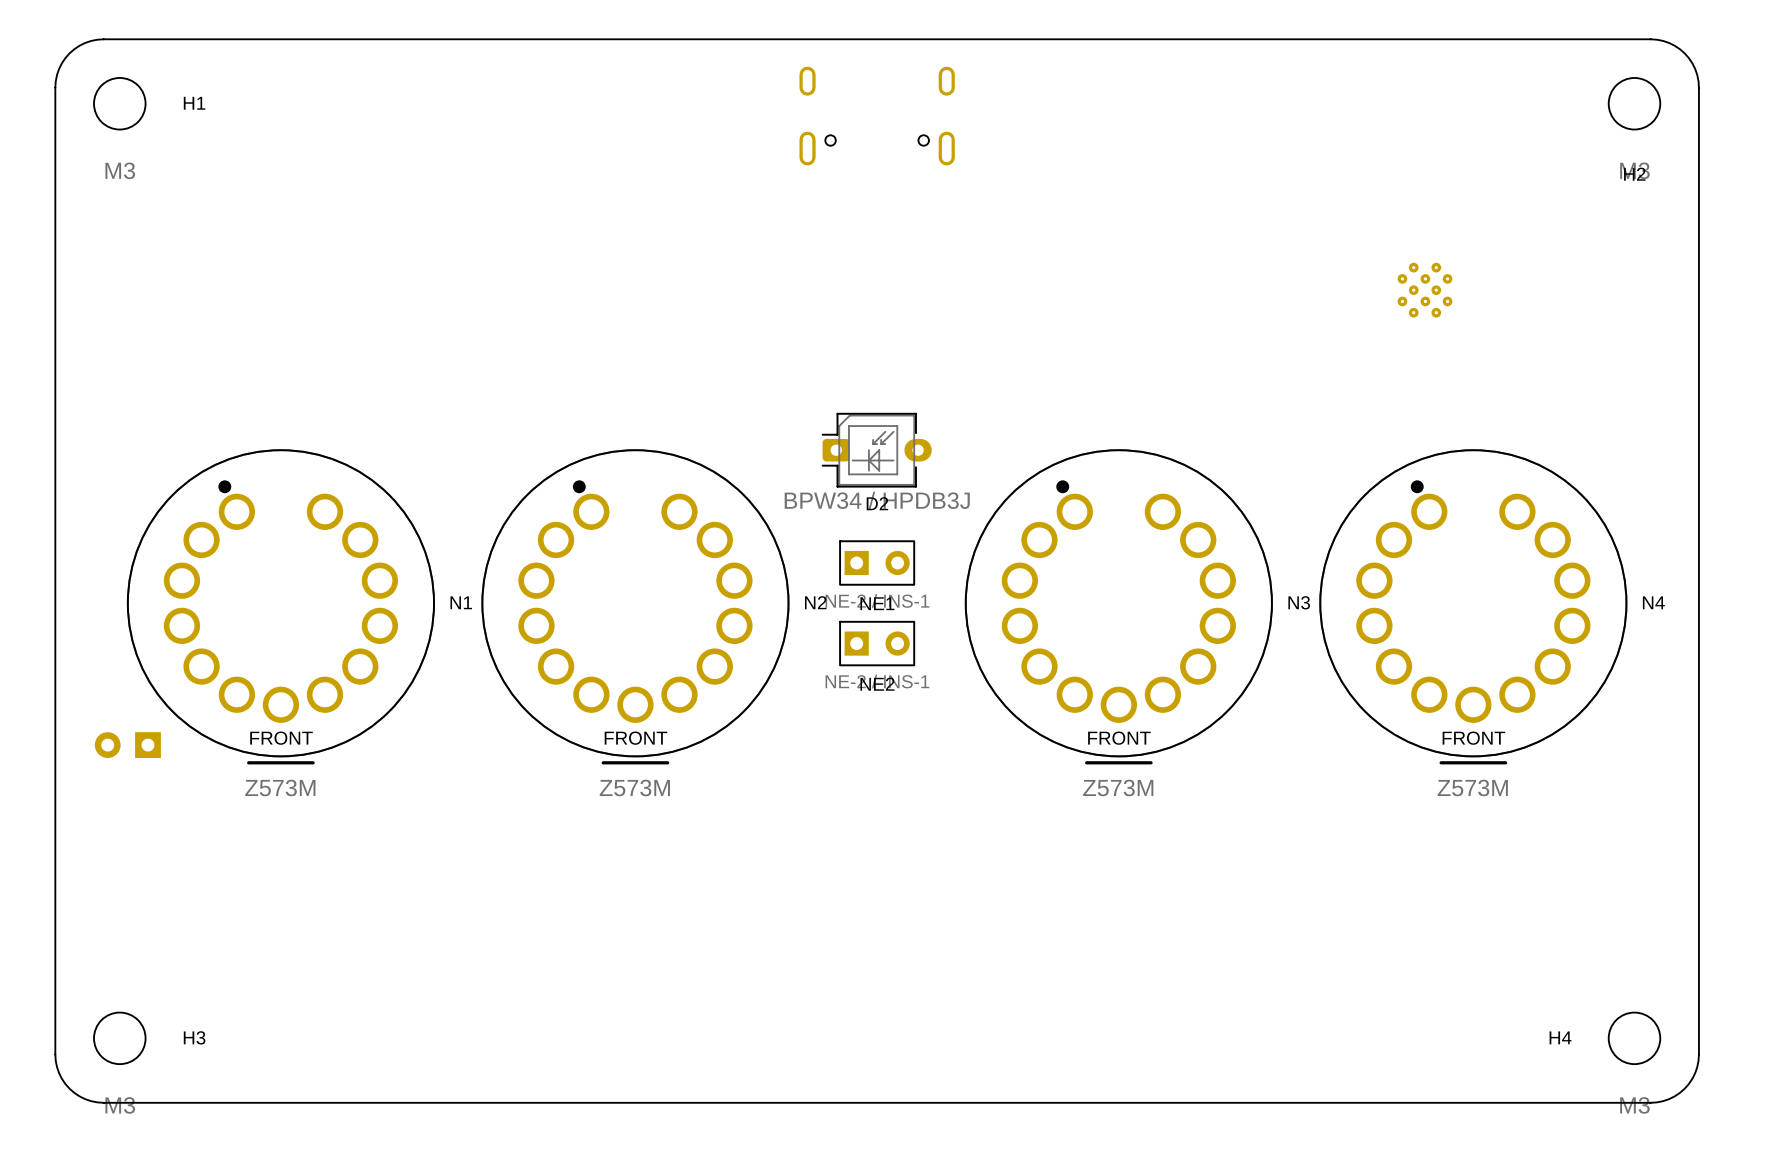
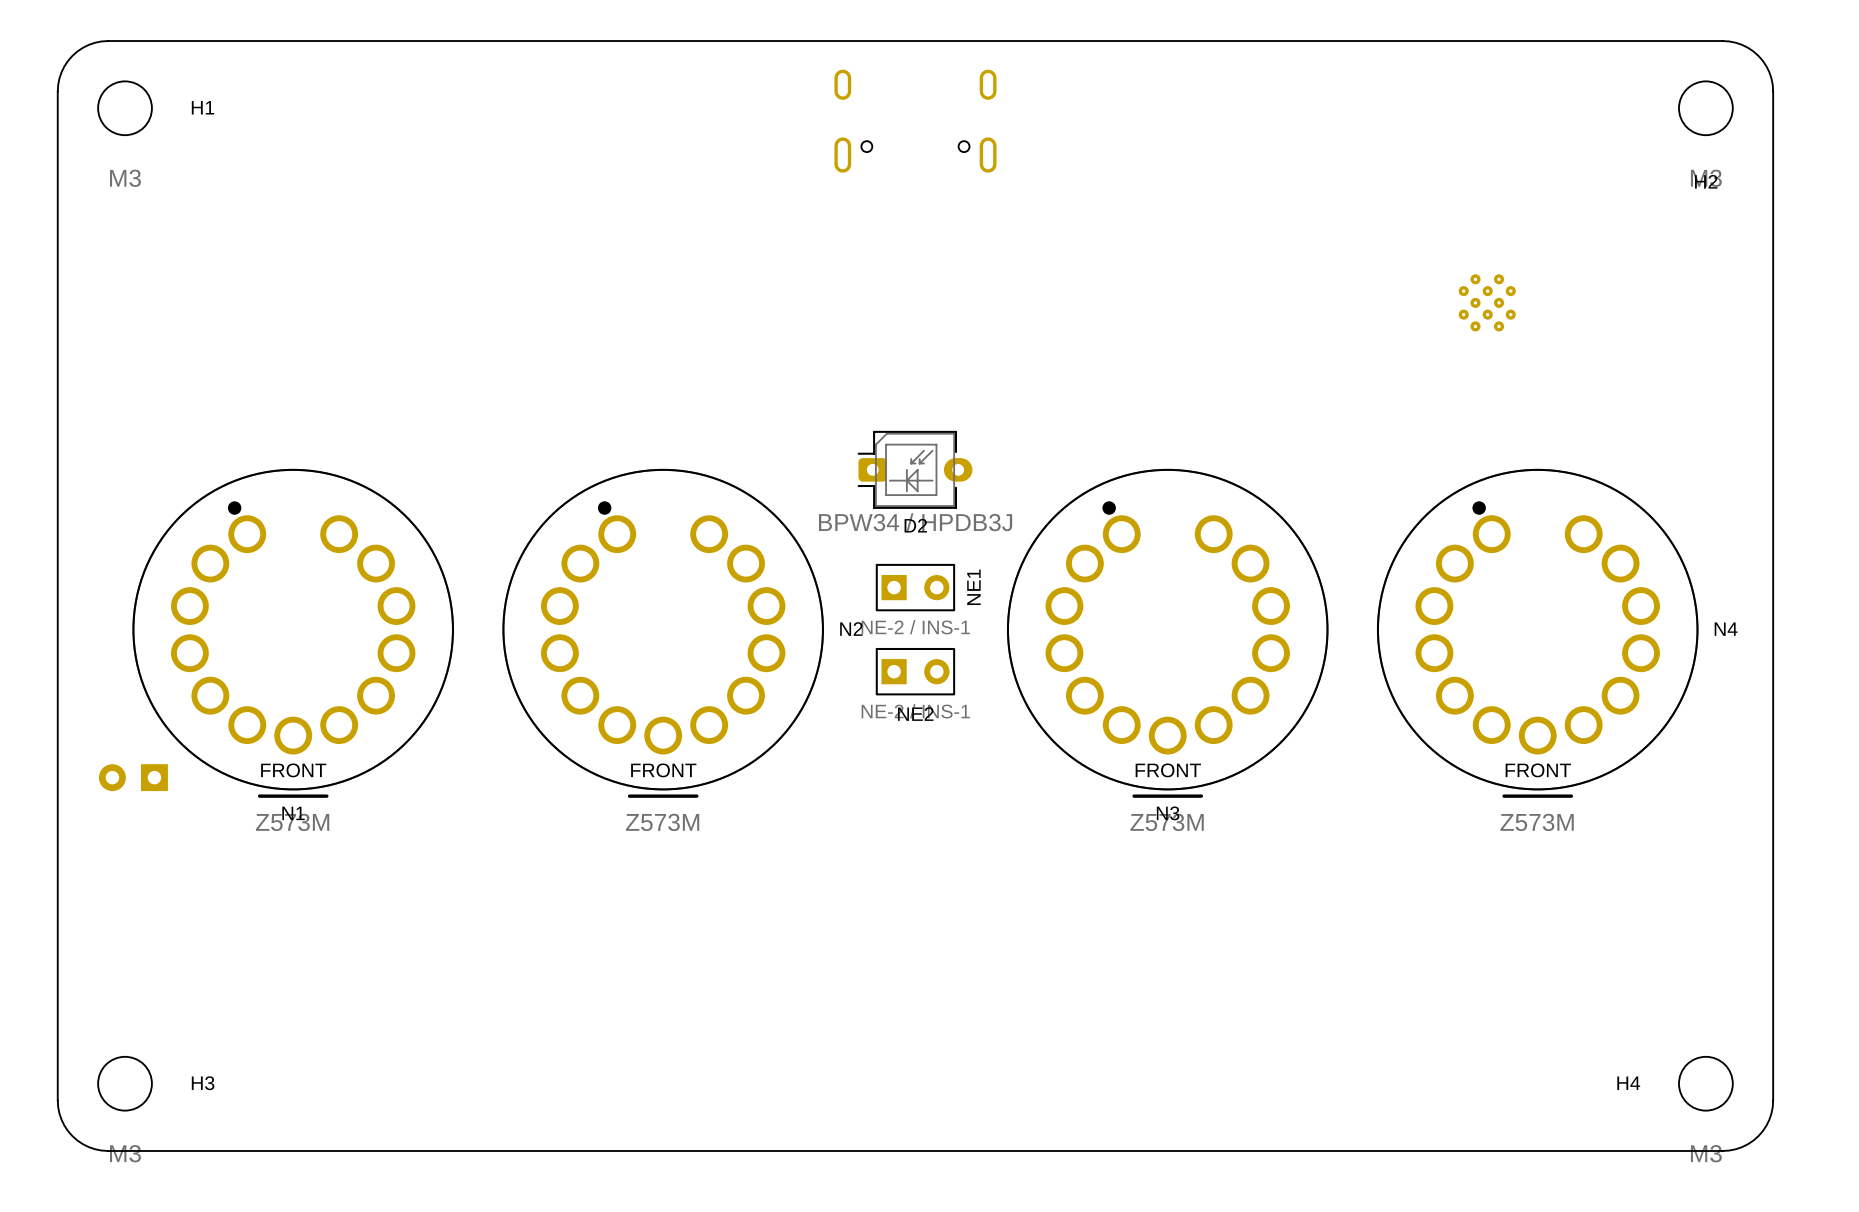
N1 name position: N1 (461, 602) -> N1 (293, 813)
N3 name position: N3 (1299, 602) -> N3 (1168, 813)
NE1 name rotation: 0° (877, 603) -> 90° counterclockwise (973, 587)
NE1 name position: NE1 (877, 603) -> NE1 (973, 587)

